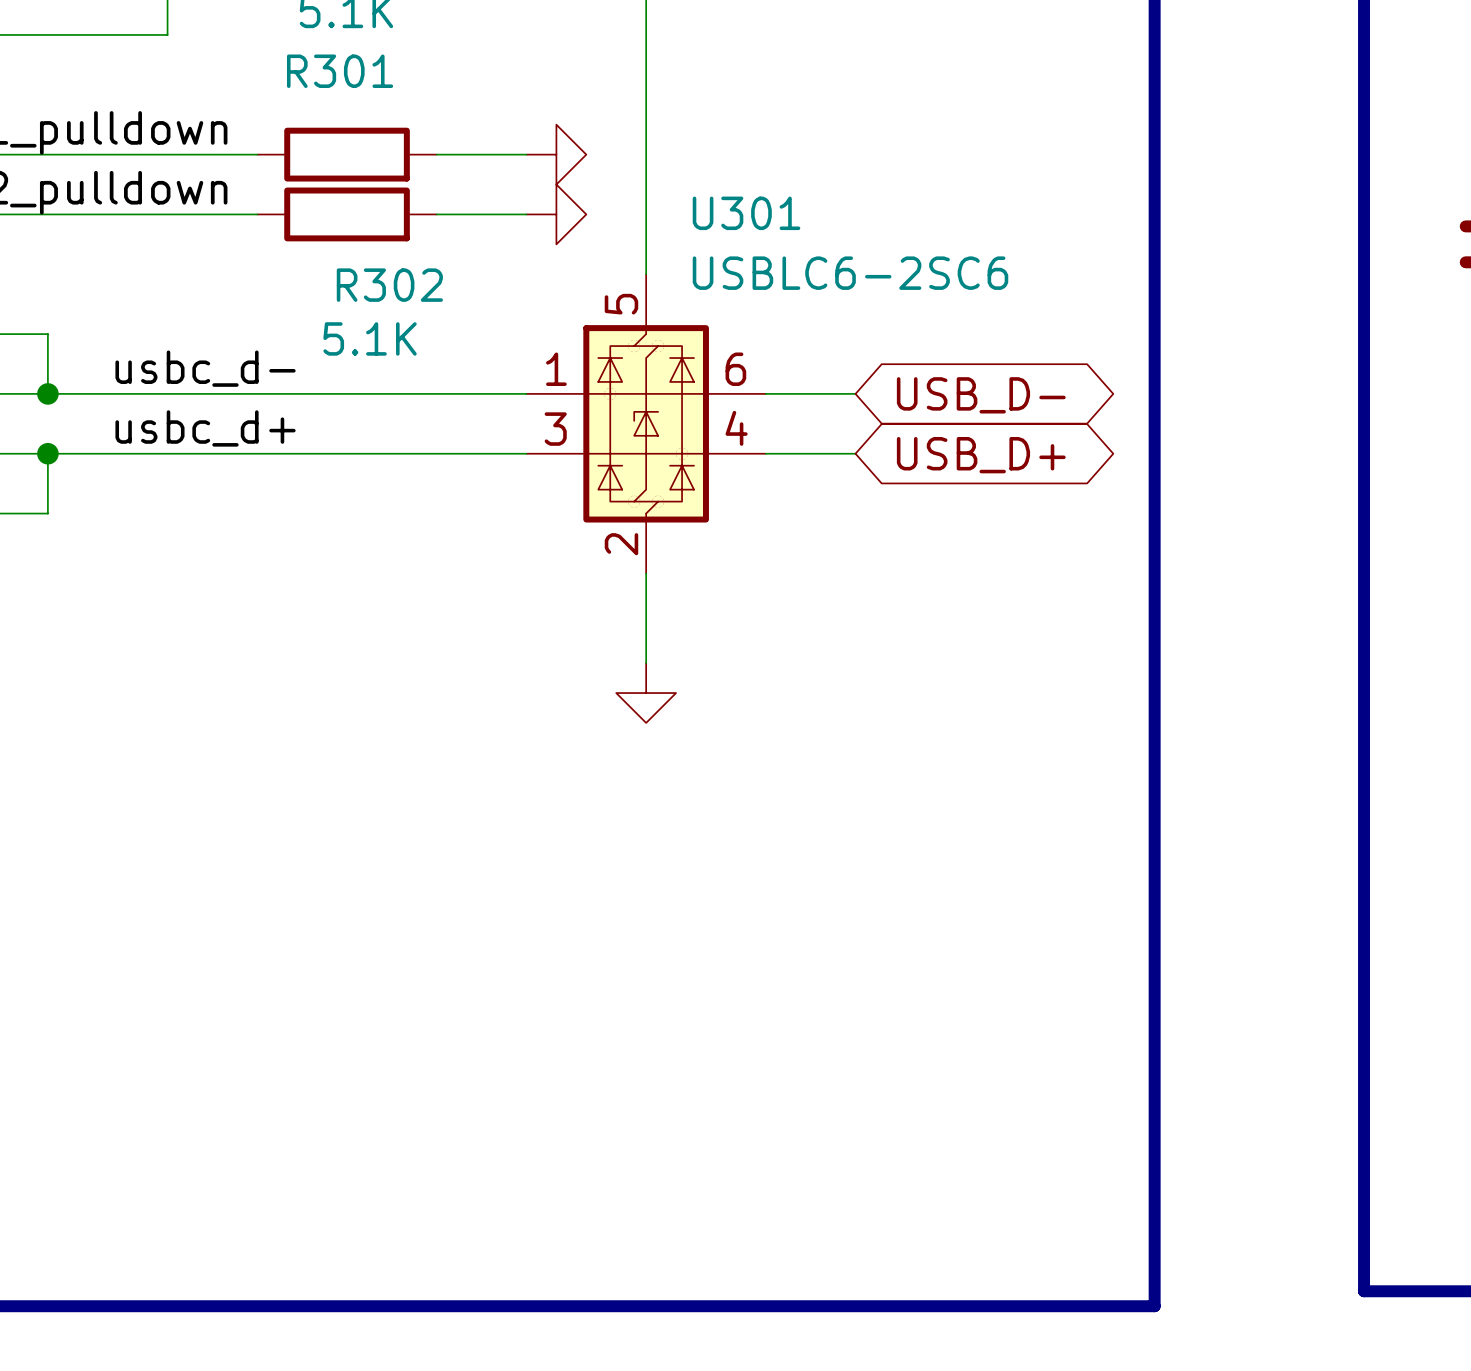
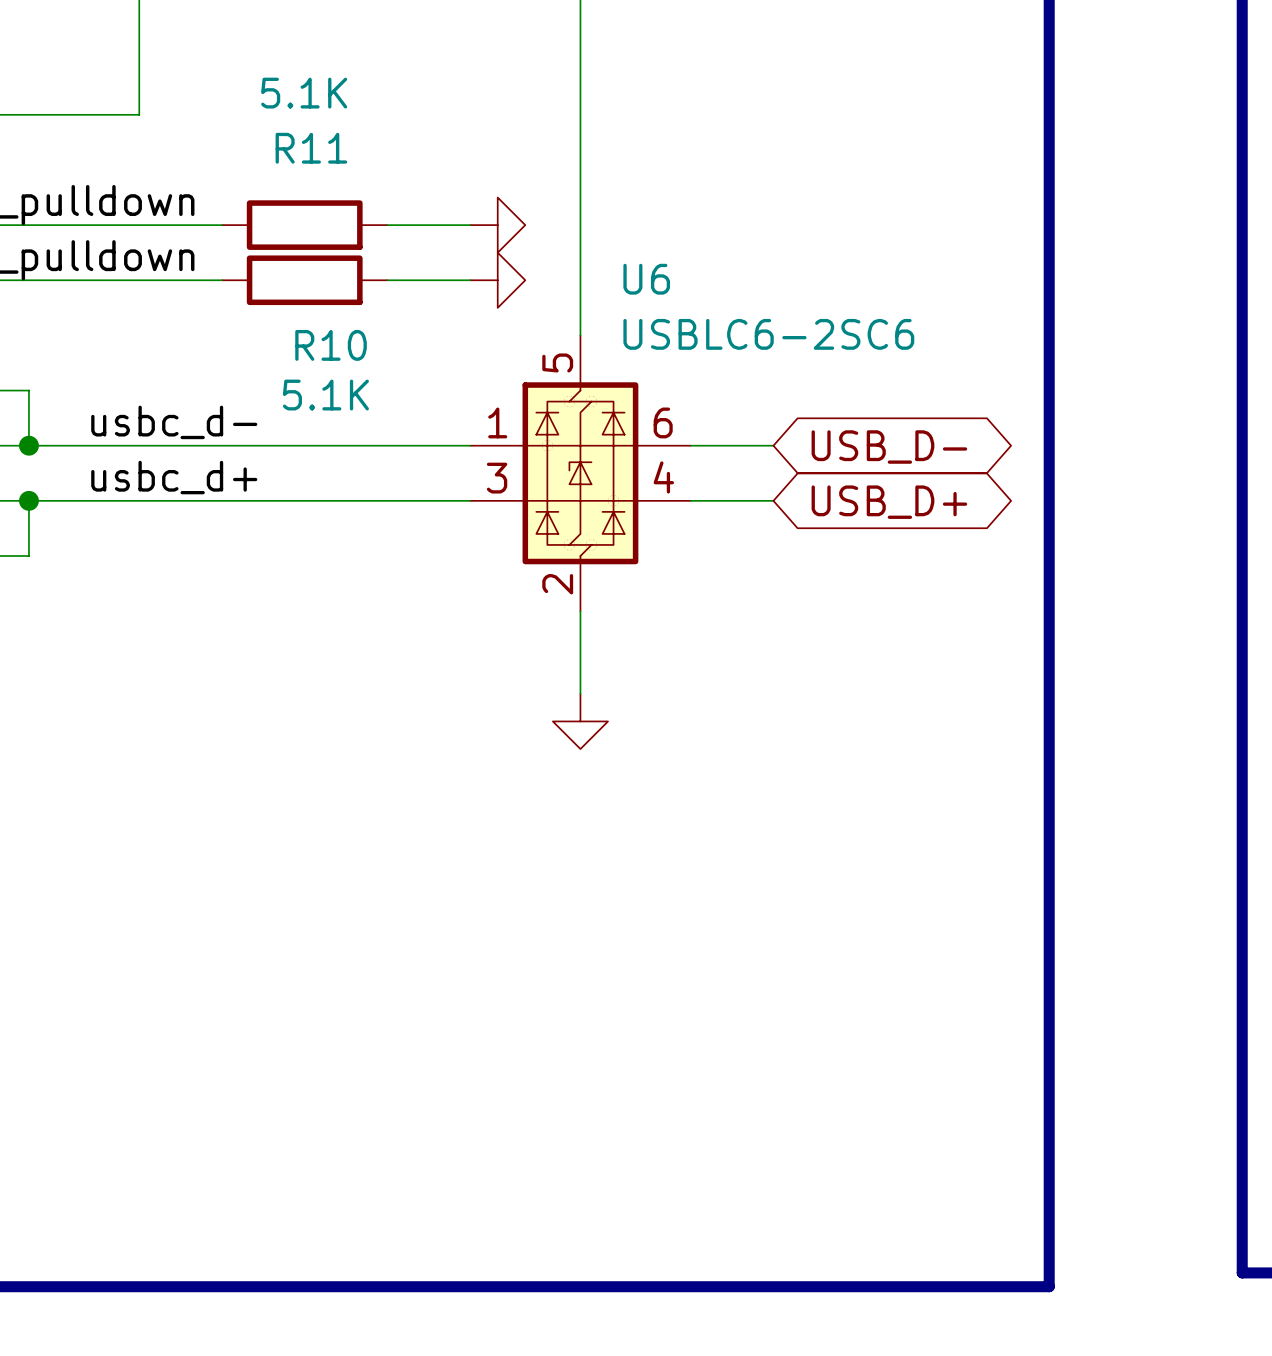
R301 name: R301 (340, 71) -> R11 (311, 148)
U301 name: U301 (746, 213) -> U6 (646, 279)
R302 name: R302 (389, 285) -> R10 (331, 345)

